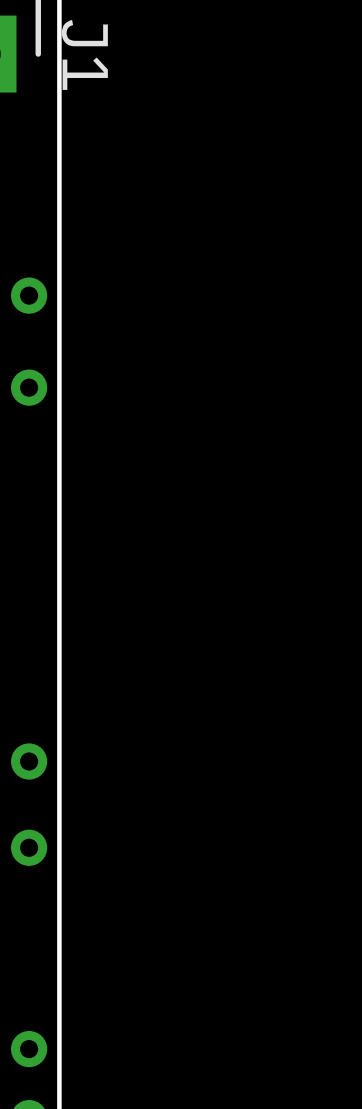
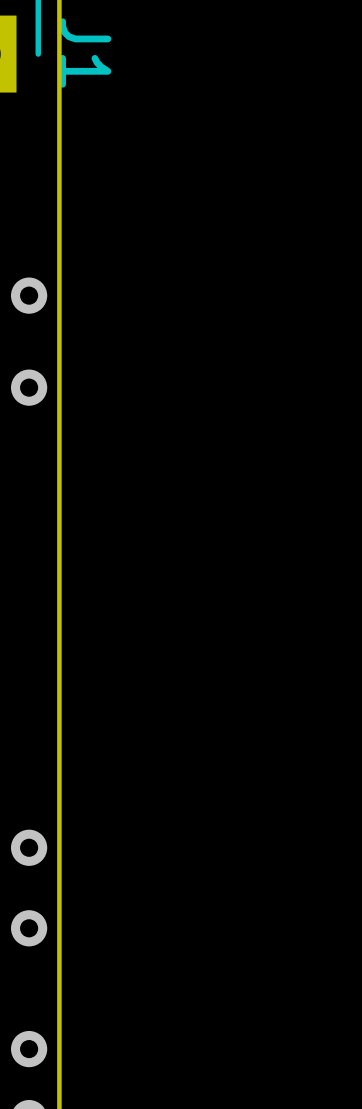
via: (29, 761) -> none
via: none -> (29, 928)

